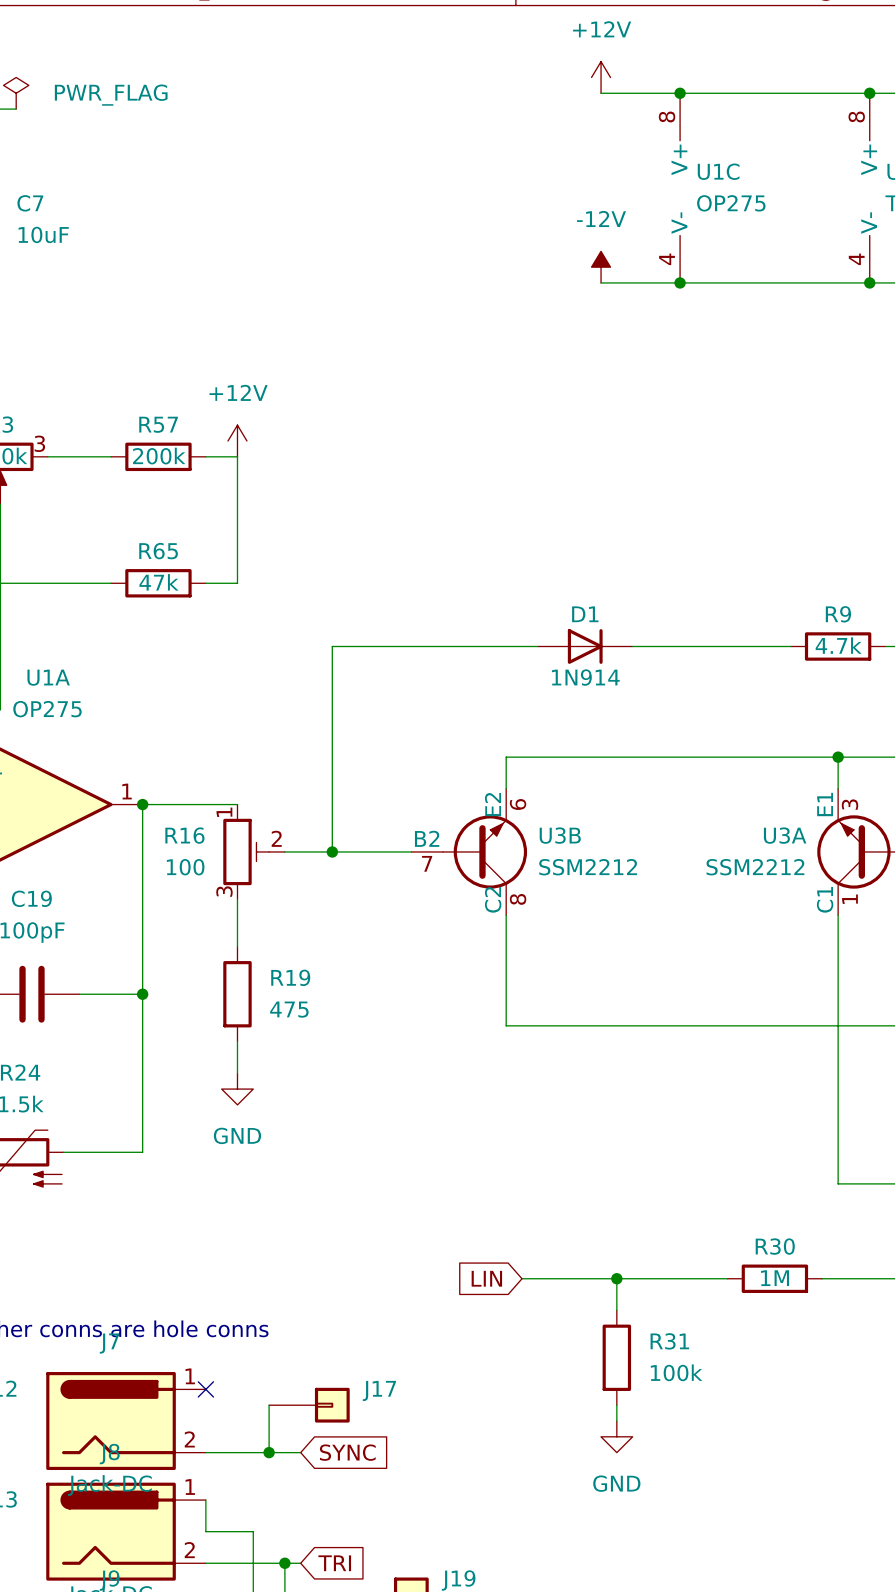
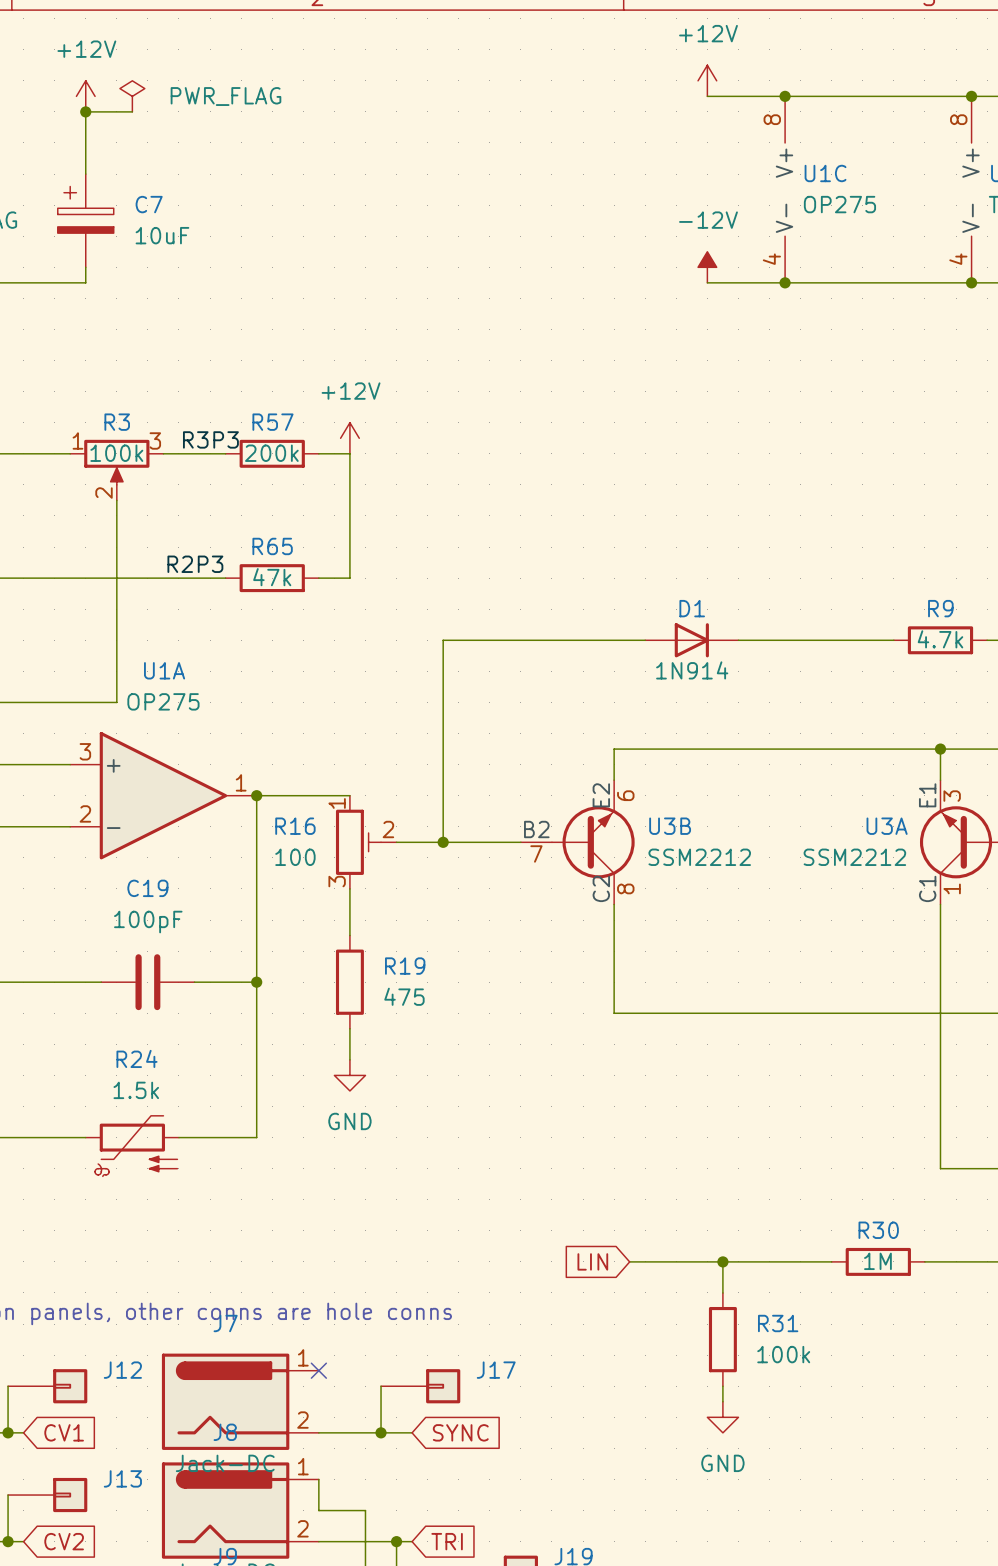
label: none -> R3P3 (210, 439)
label: none -> R2P3 (195, 564)

